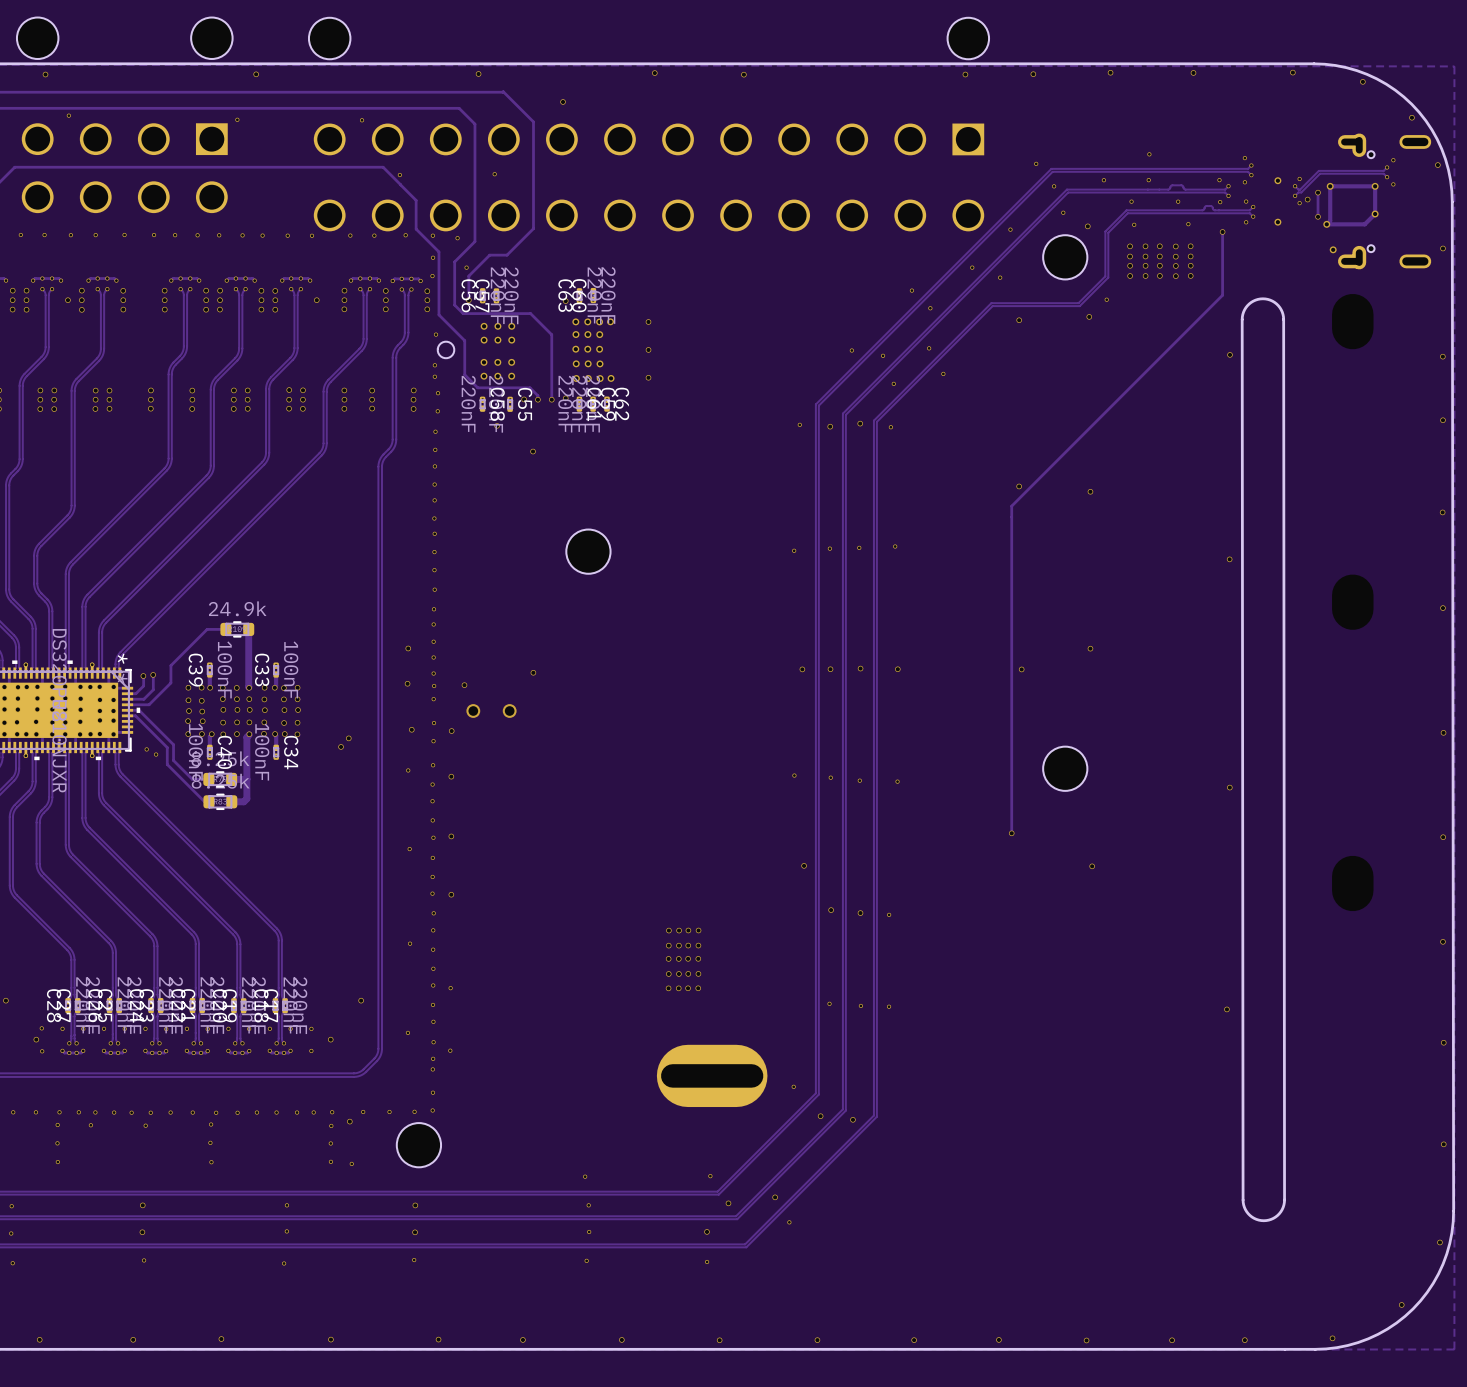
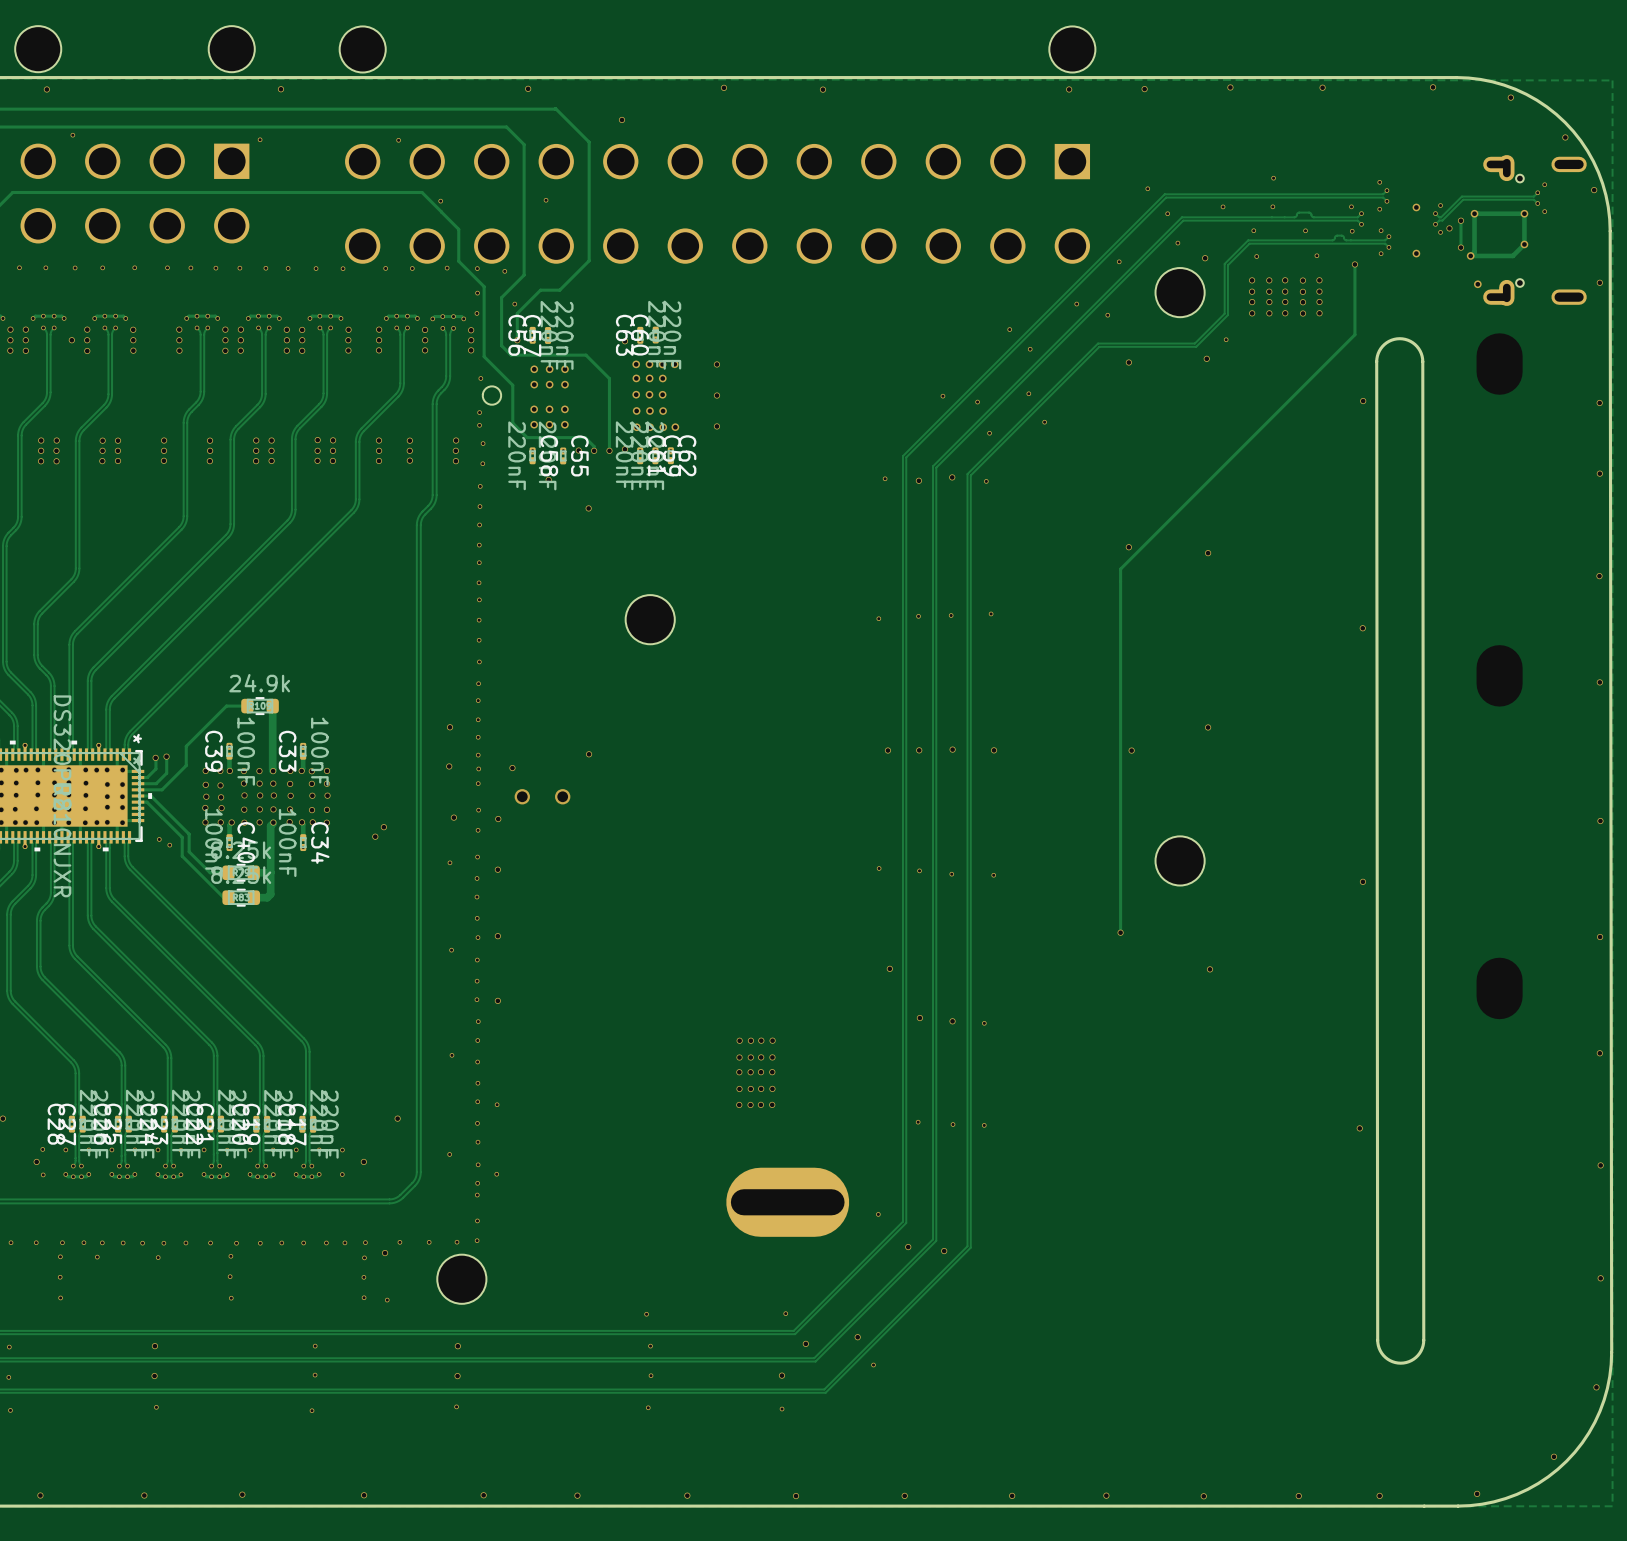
via: none -> (348, 329)
via: none -> (348, 350)

